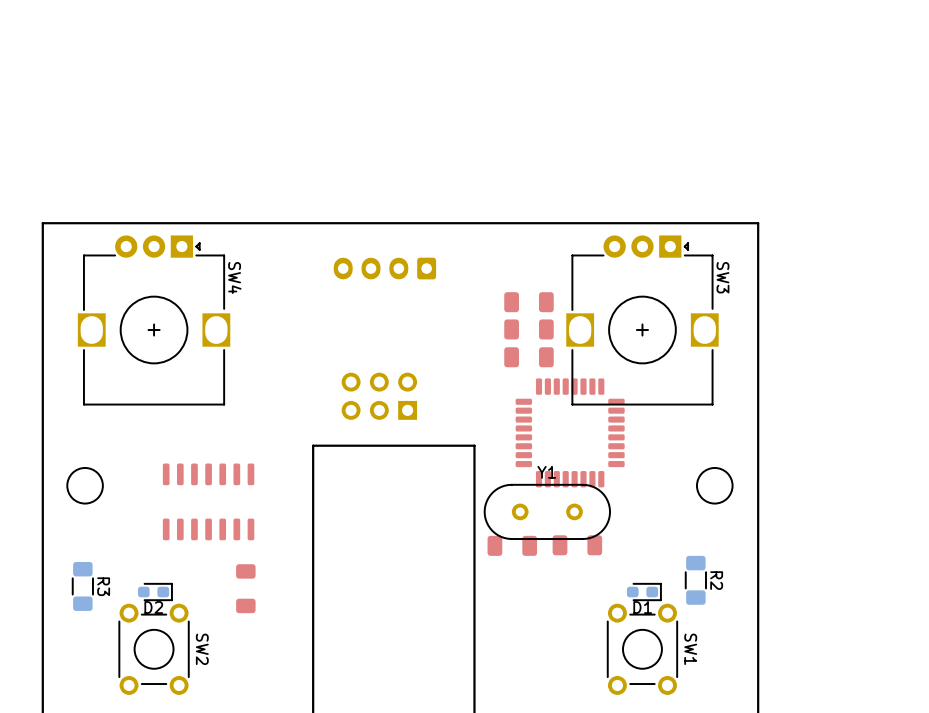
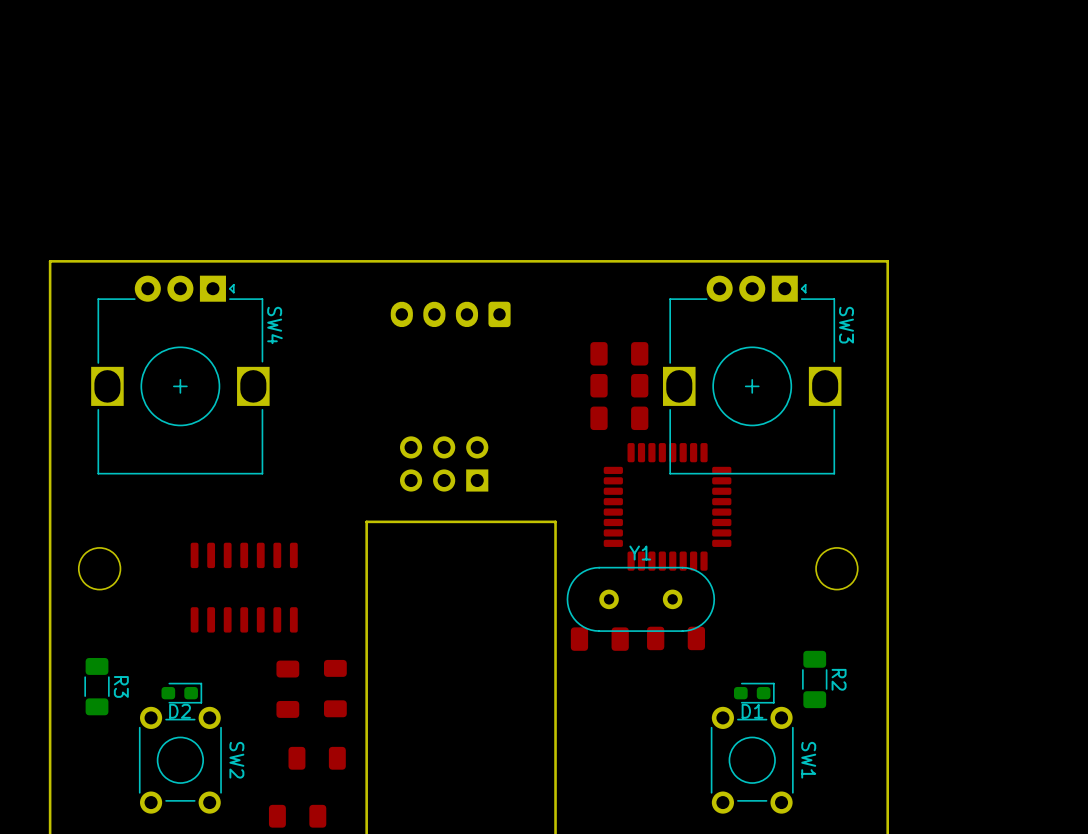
part: none -> (335, 688)
part: none -> (317, 758)
part: none -> (297, 816)

